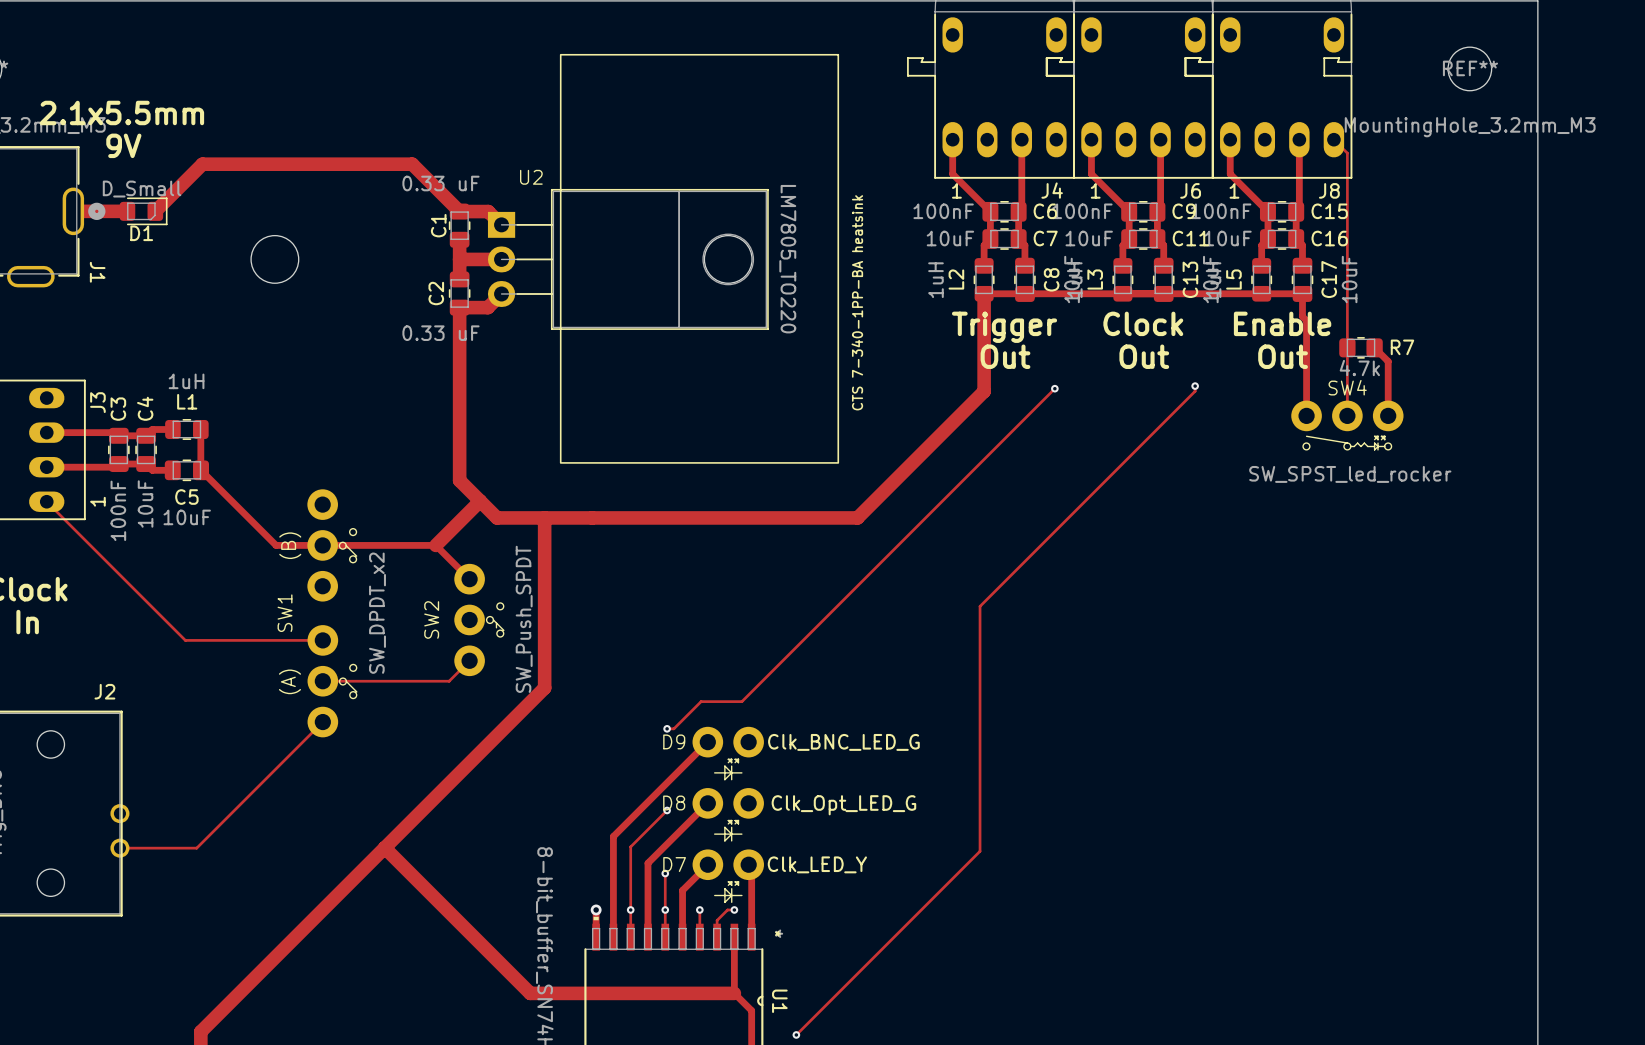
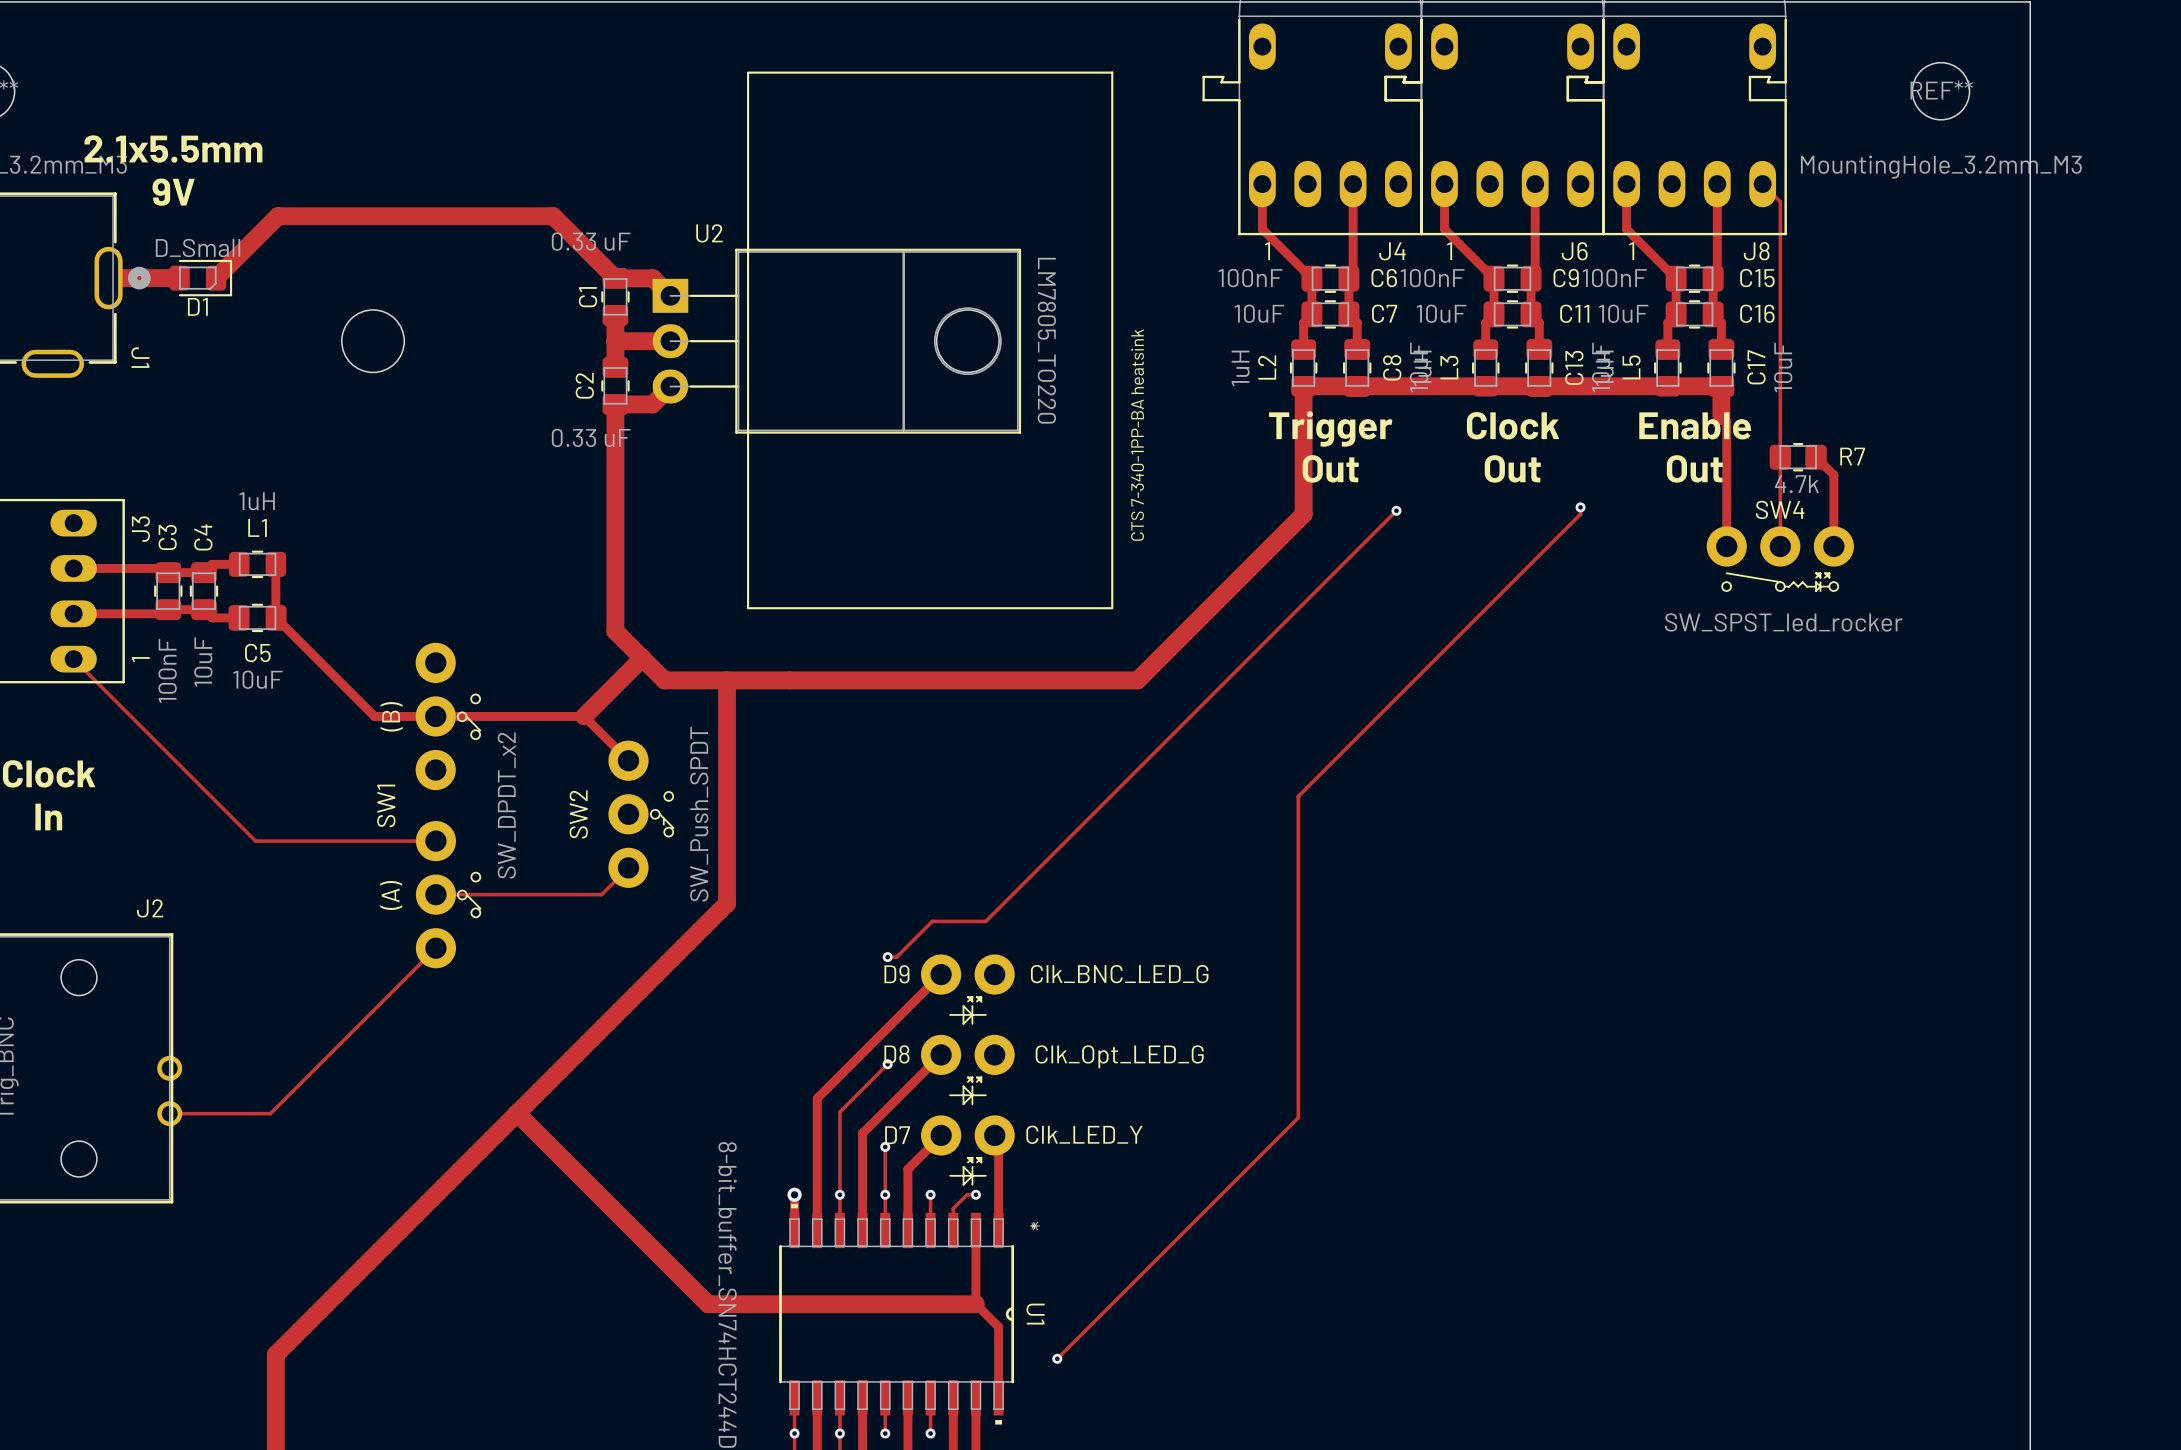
track width: thin (984, 293) (1024, 293) -> thick (1303, 386) (1356, 386)
track width: thin (1034, 293) (1302, 293) -> thick (1369, 386) (1721, 386)
track width: thin (1302, 293) (1302, 316) -> thick (1721, 386) (1721, 416)

